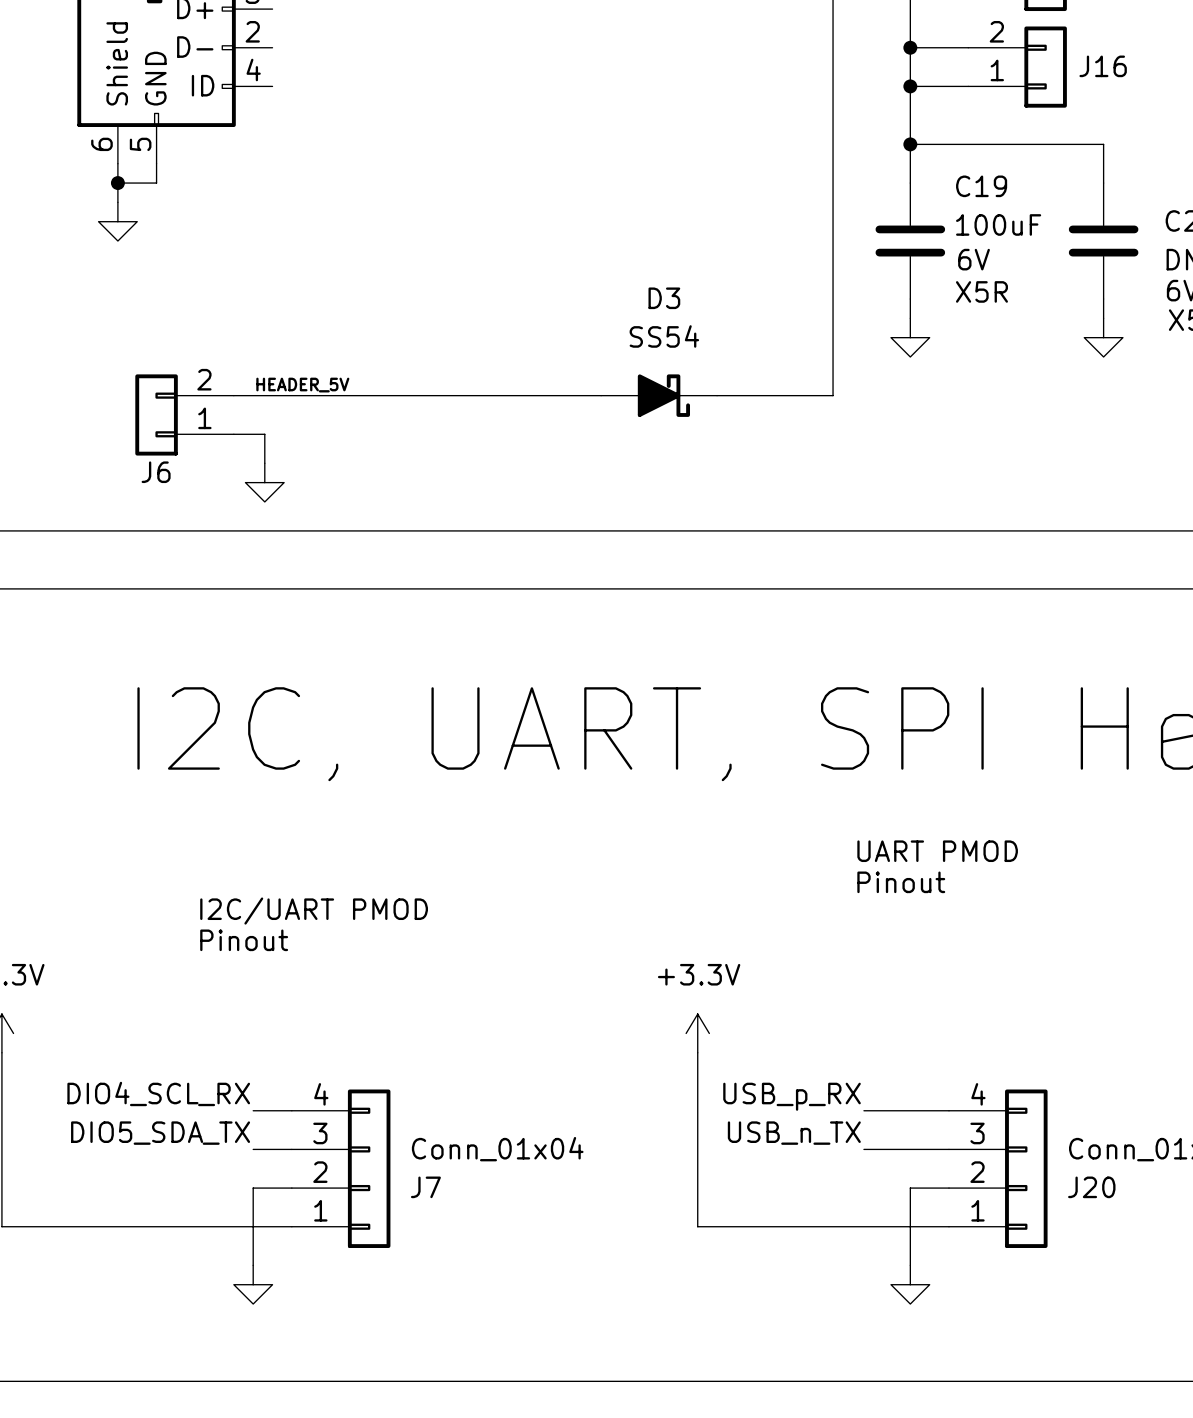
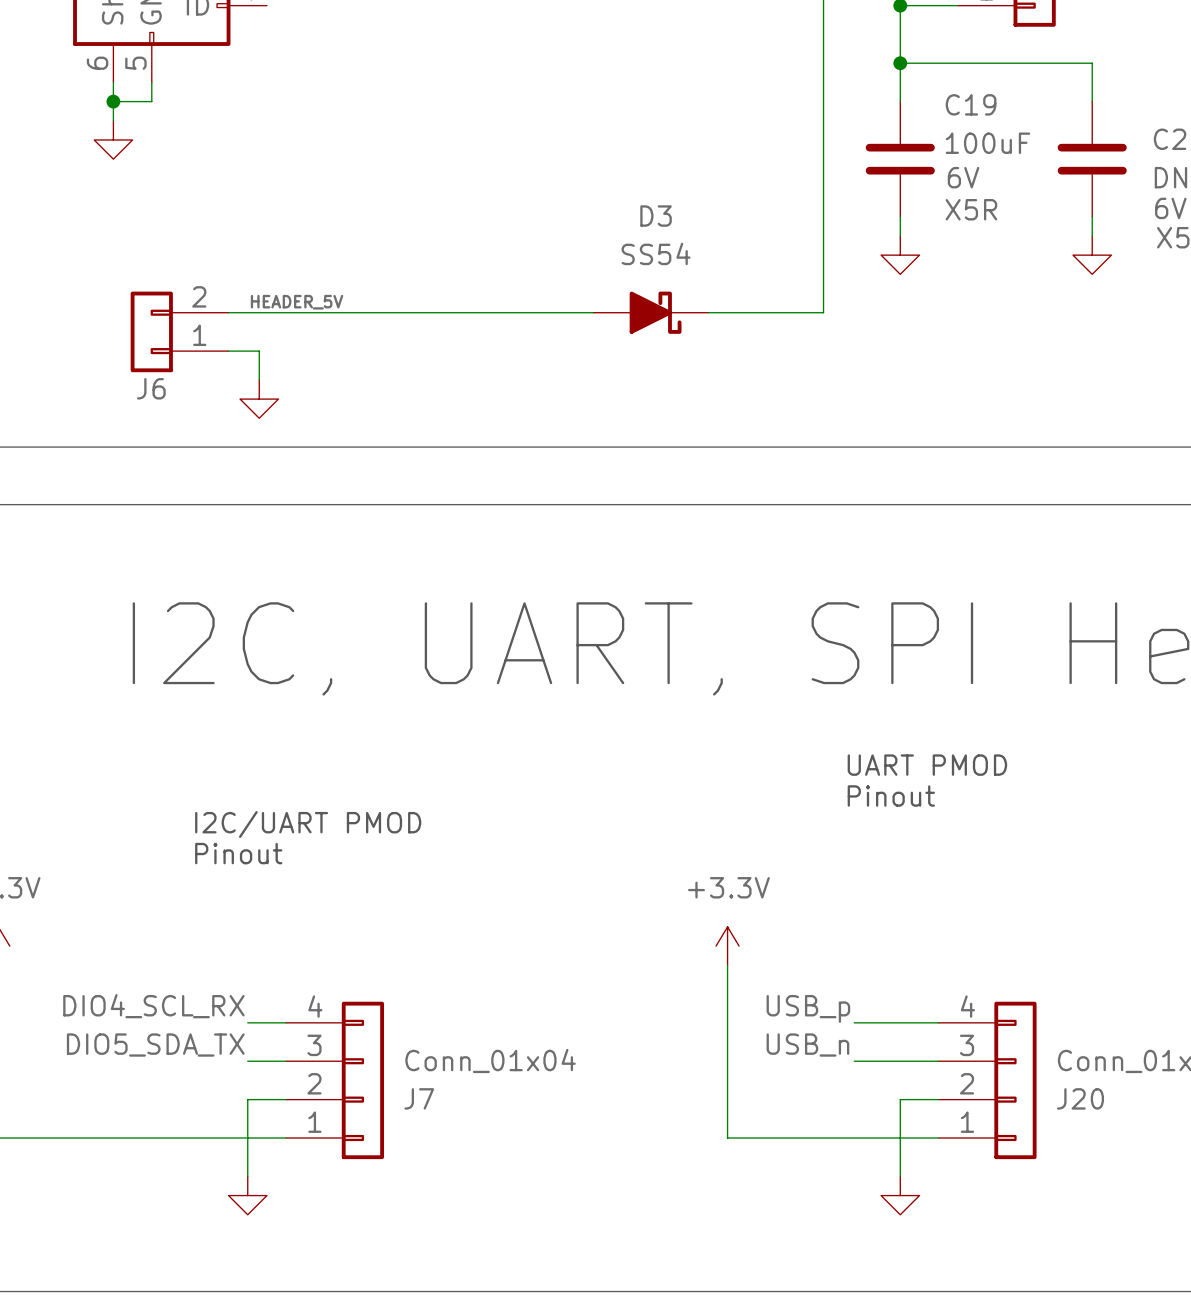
power symbol position: +3.3V (697, 1033) -> +3.3V (727, 946)
wire: (697, 1052) (697, 1226) (736, 1226) -> (727, 965) (727, 1138)
label: USB_p_RX (792, 1096) -> USB_p (808, 1008)
label: USB_n_TX (794, 1133) -> USB_n (807, 1045)

